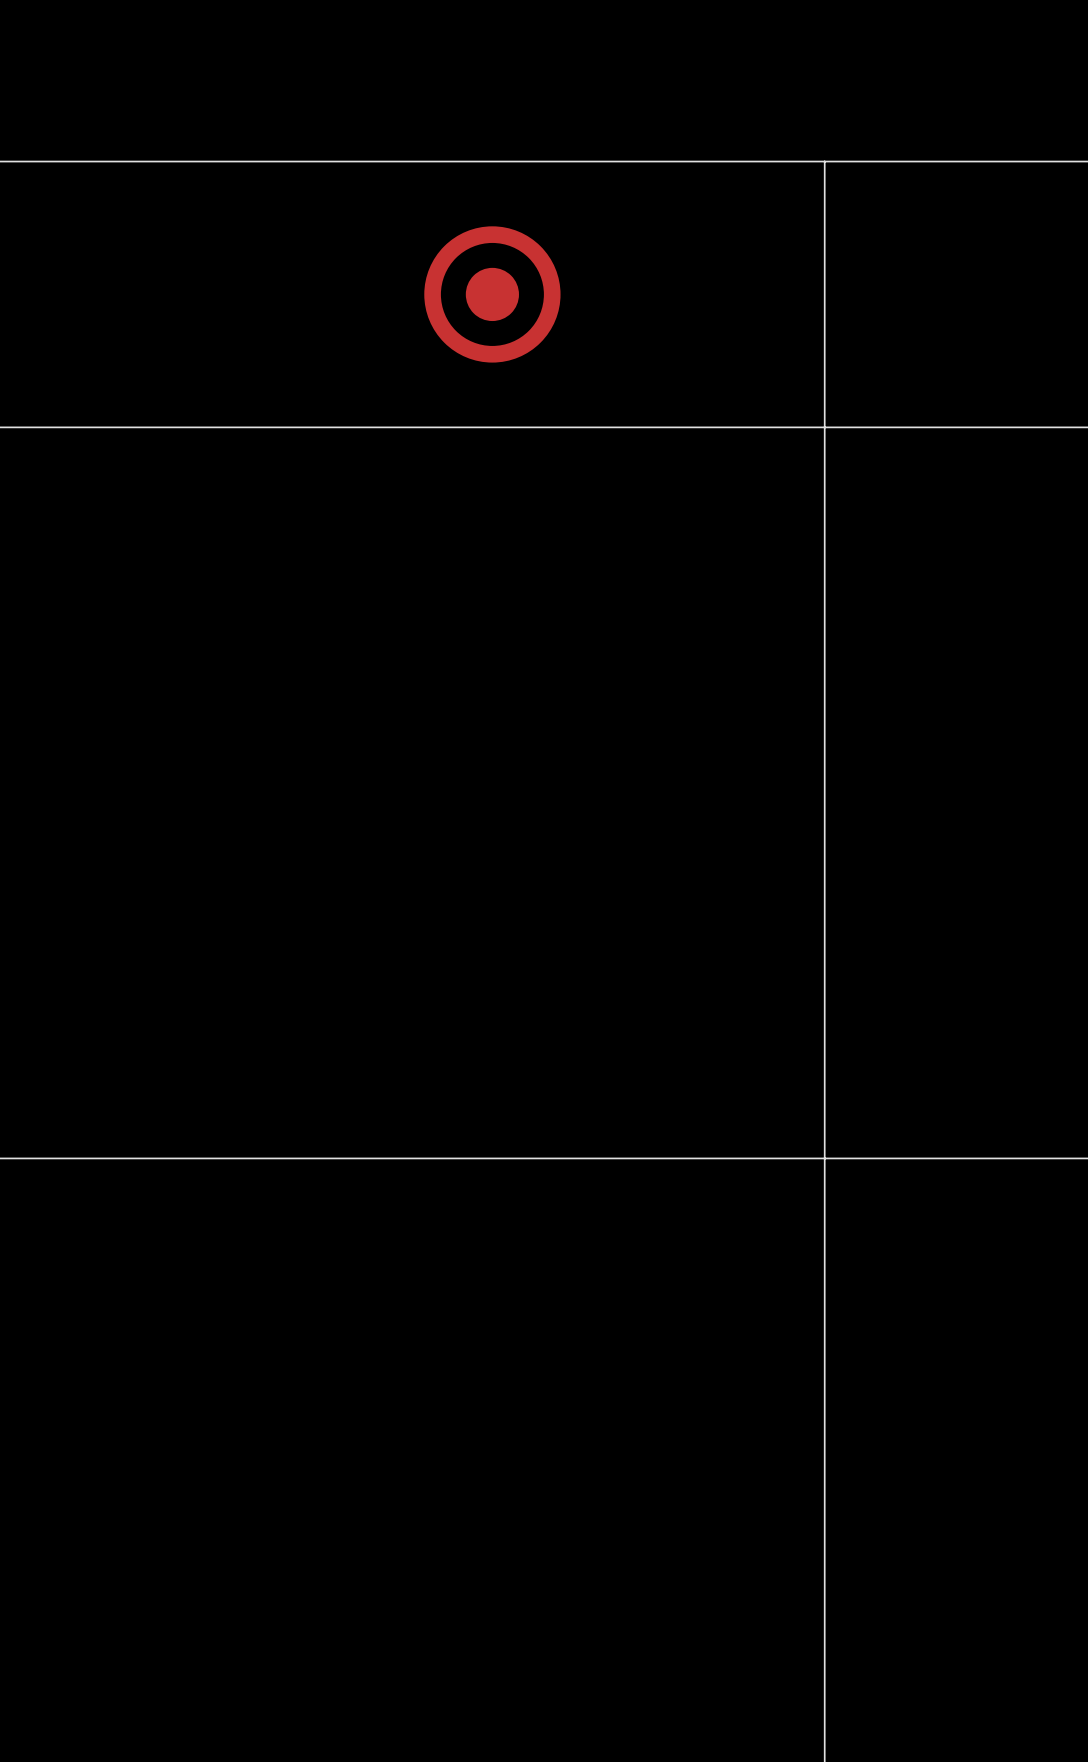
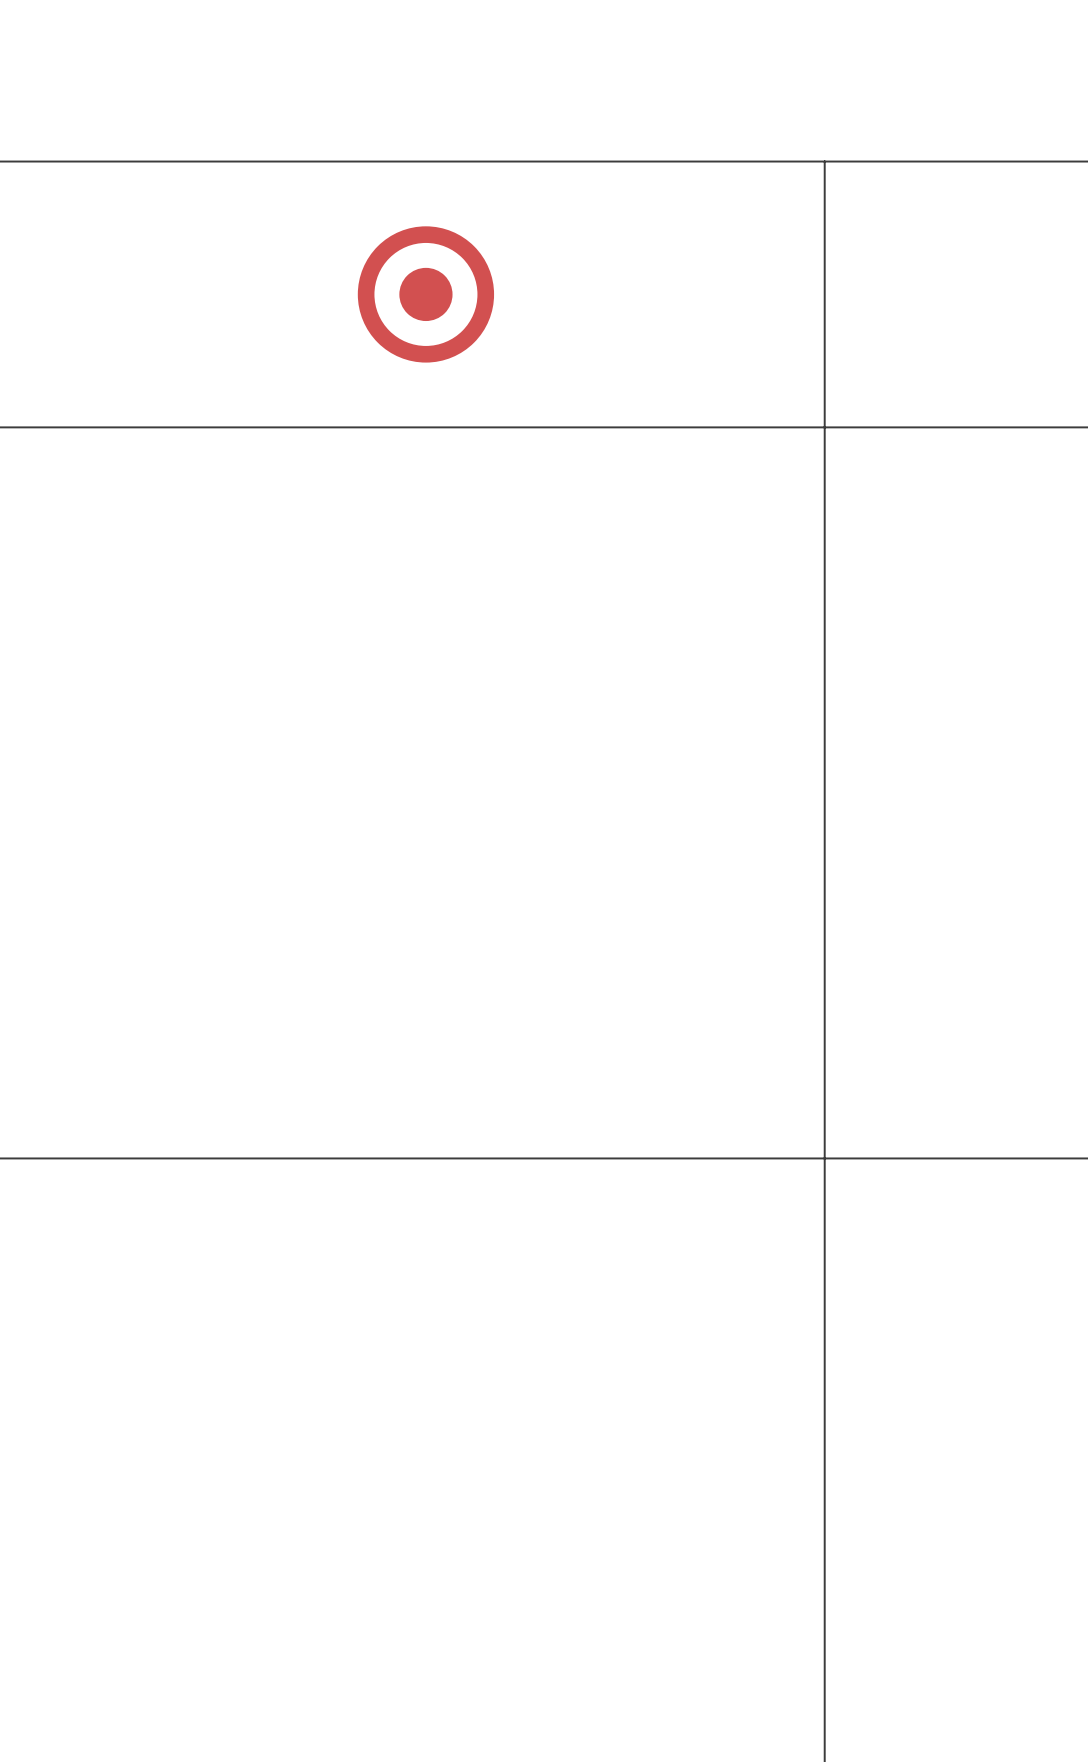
drawing position: (492, 294) -> (425, 294)
part position: (492, 294) -> (425, 294)

